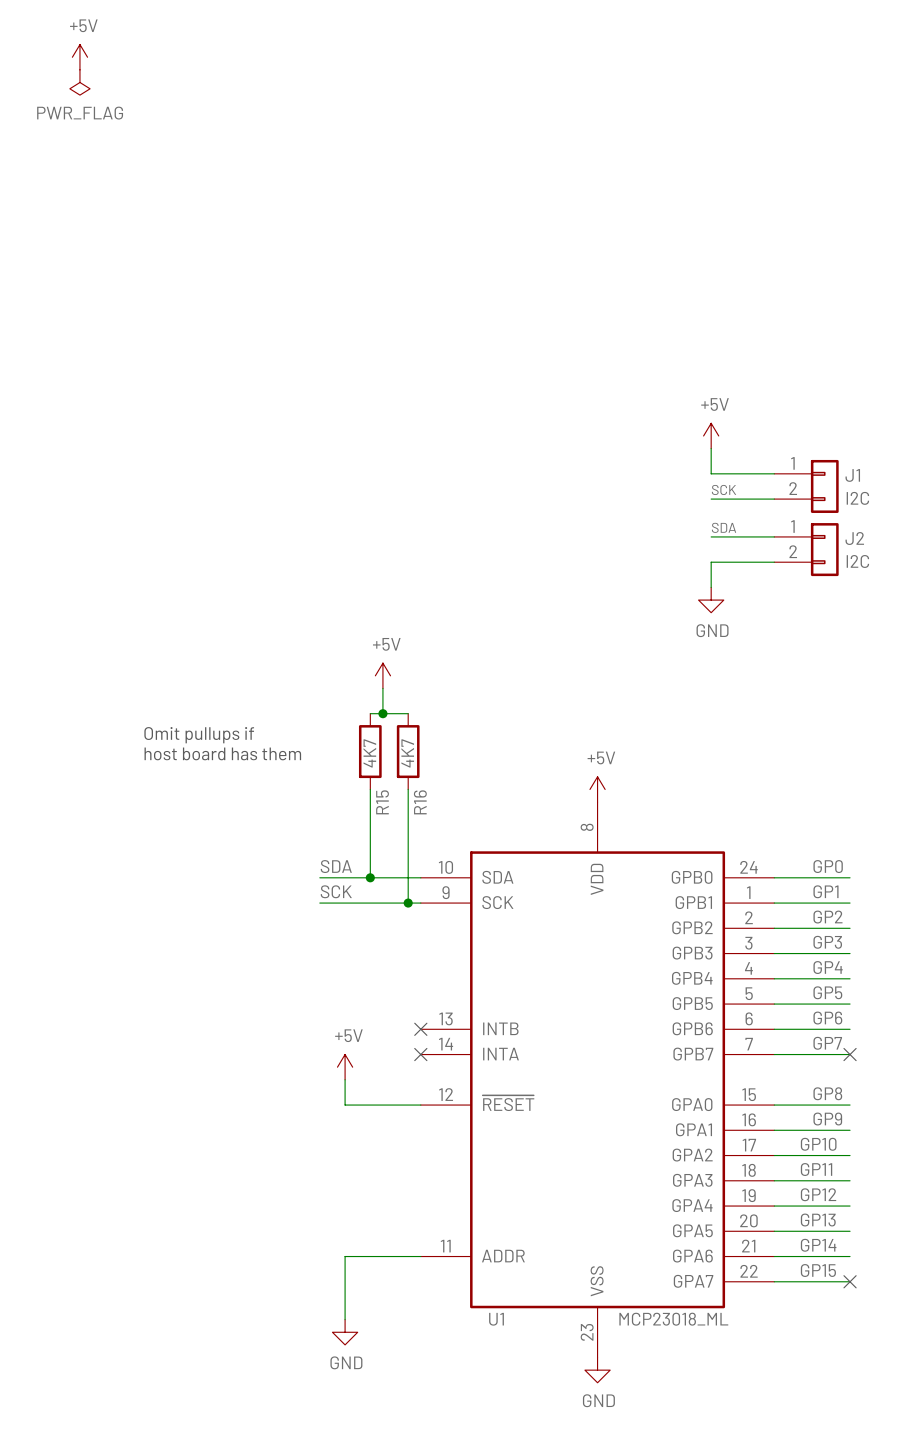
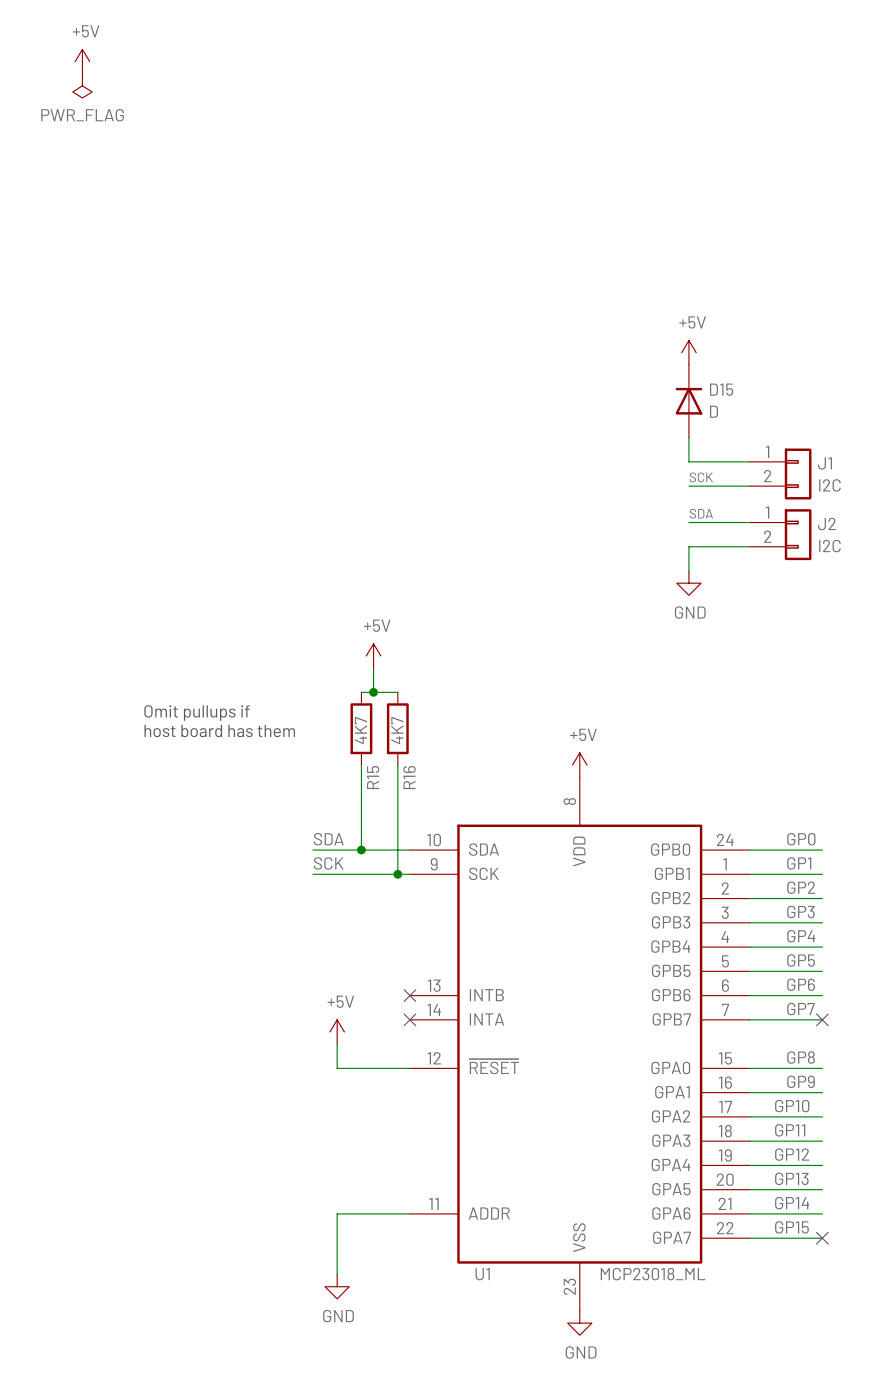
D15: none -> D (688, 401)
power symbol position: +5V (711, 435) -> +5V (688, 352)

